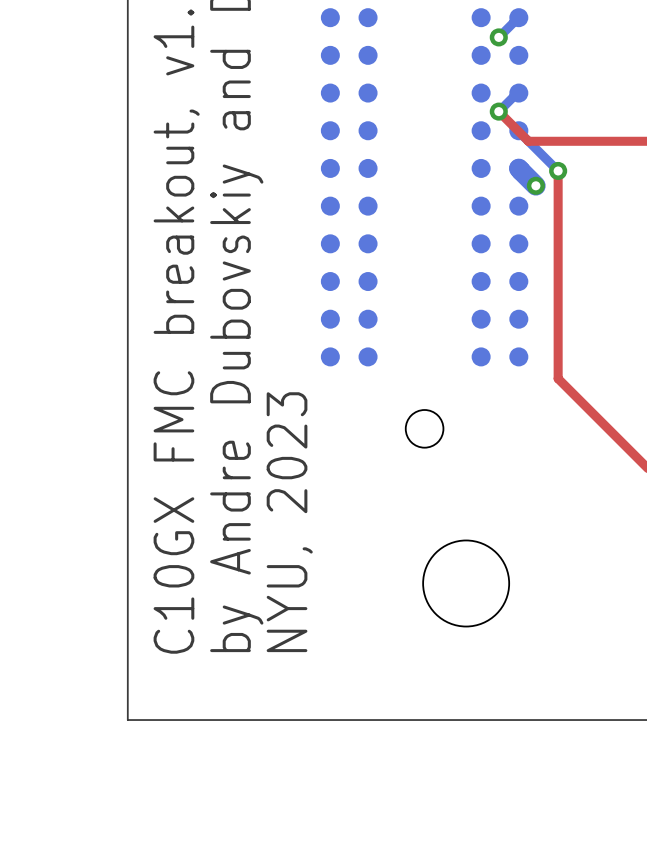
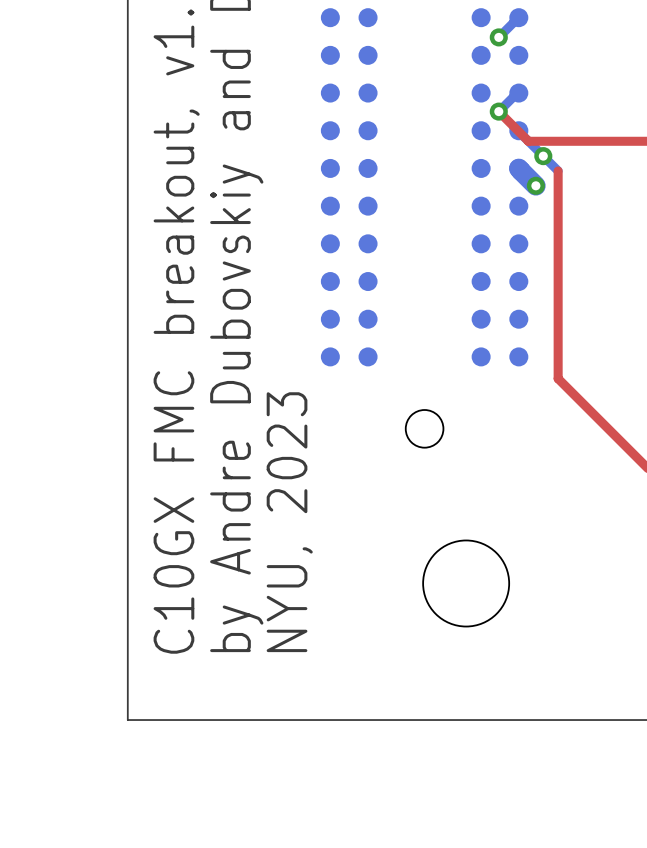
via position: (558, 170) -> (543, 156)

